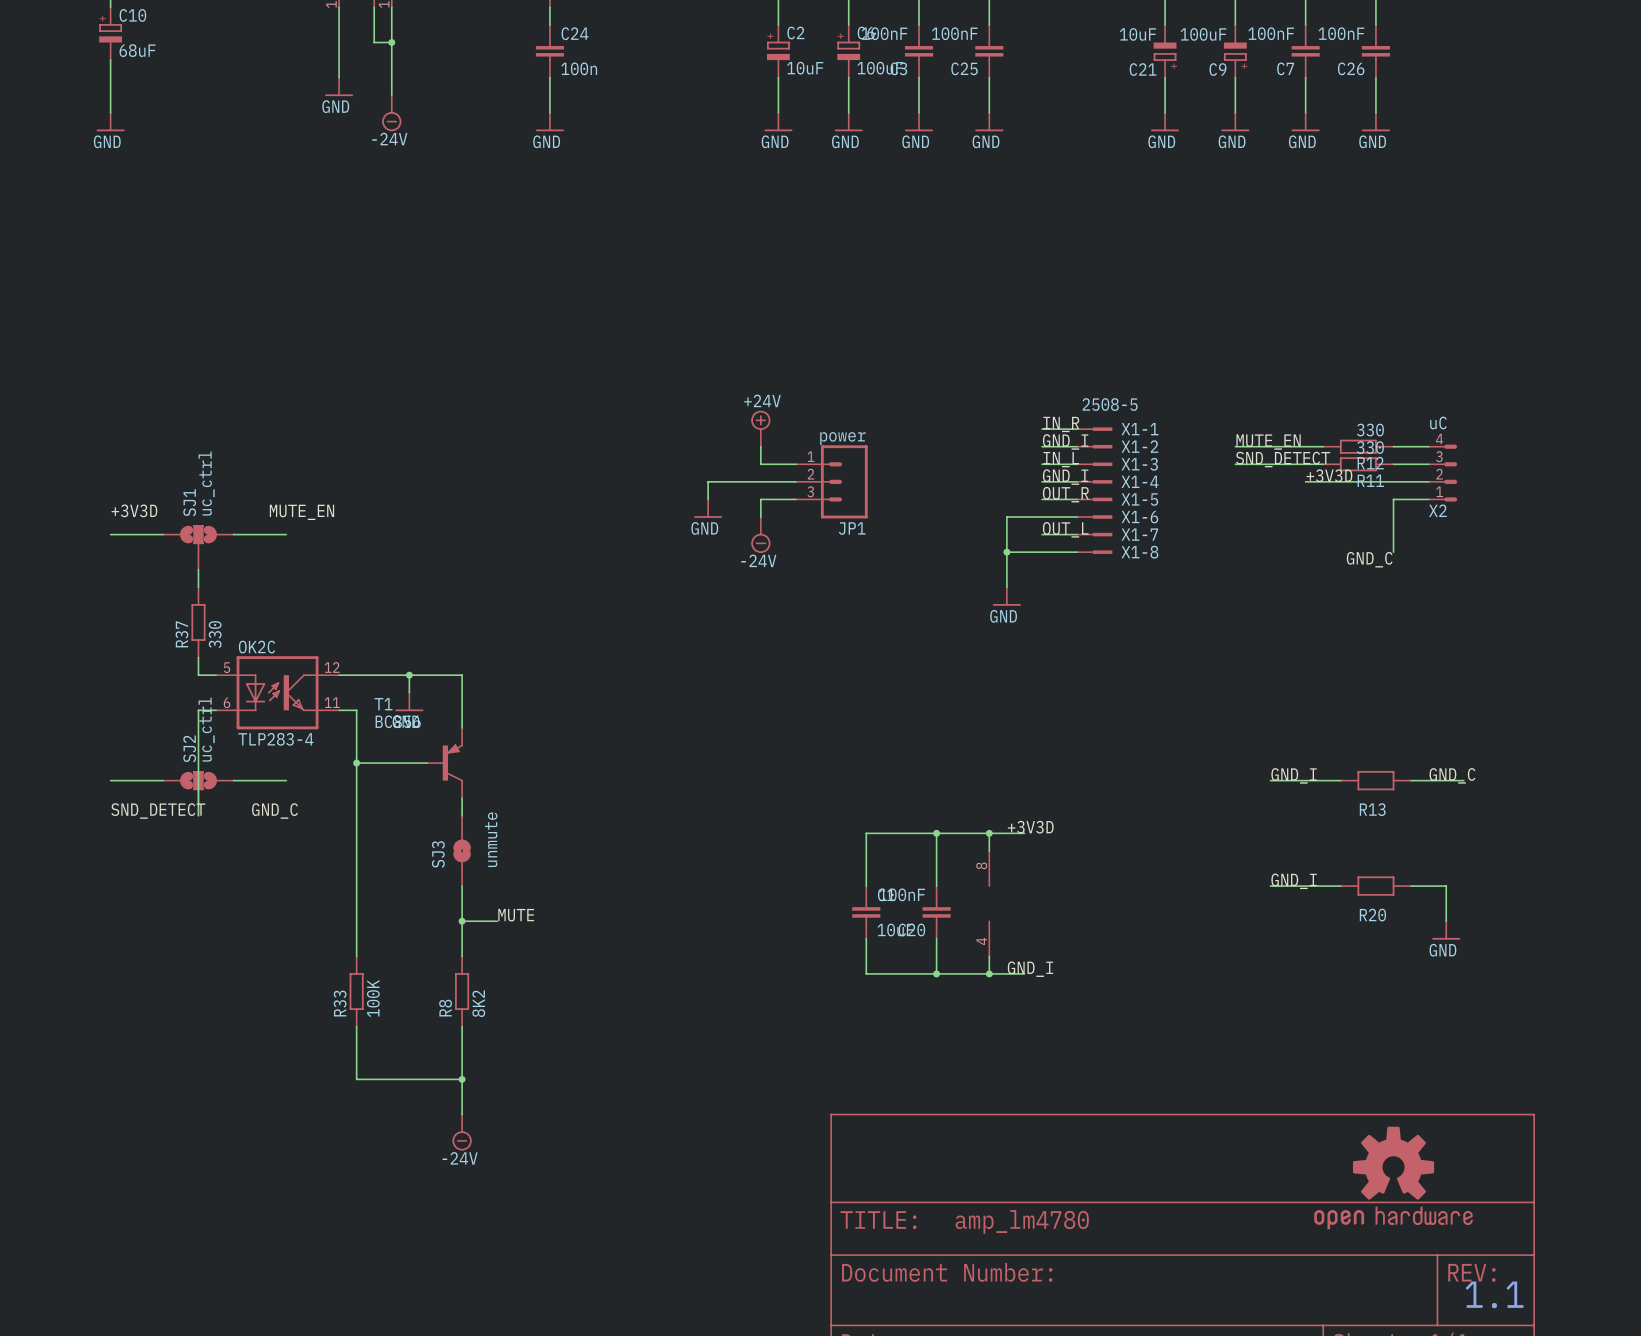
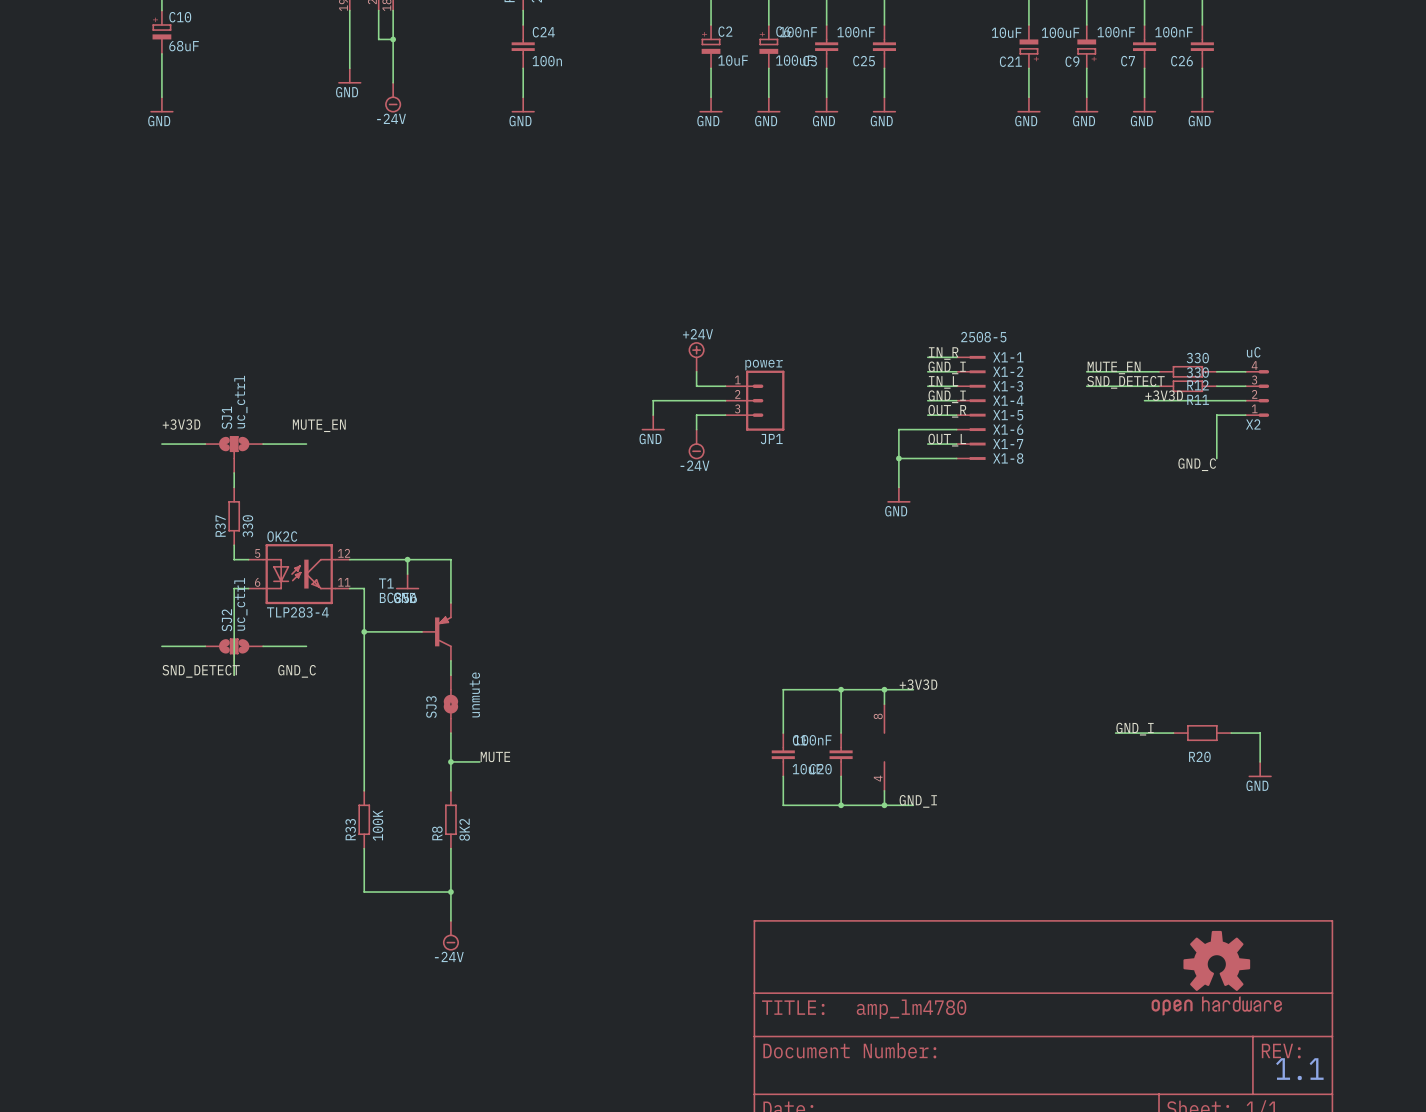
label: GND_I (1294, 775) -> none
label: GND_C (1452, 775) -> none
wire: (1270, 780) (1340, 780) -> none
R13: (1375, 780) -> none
wire: (1411, 780) (1463, 780) -> none

